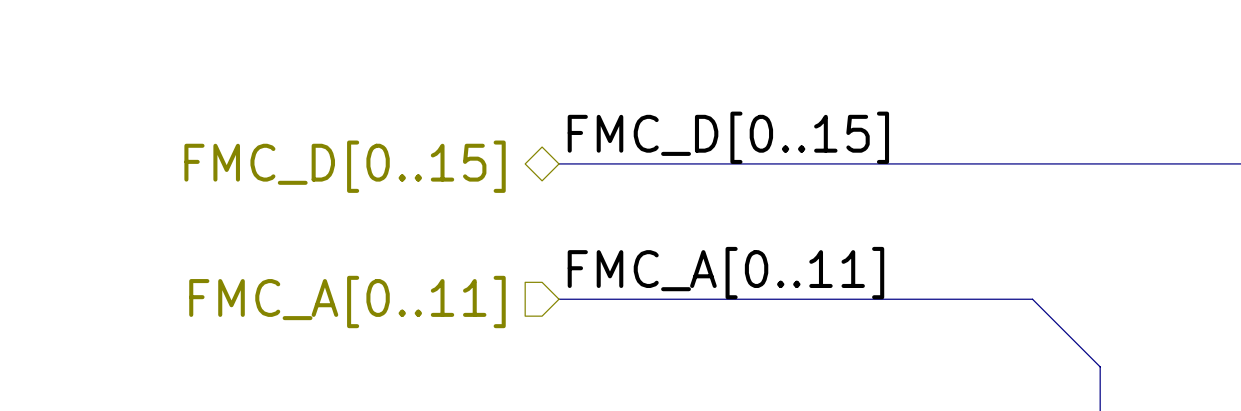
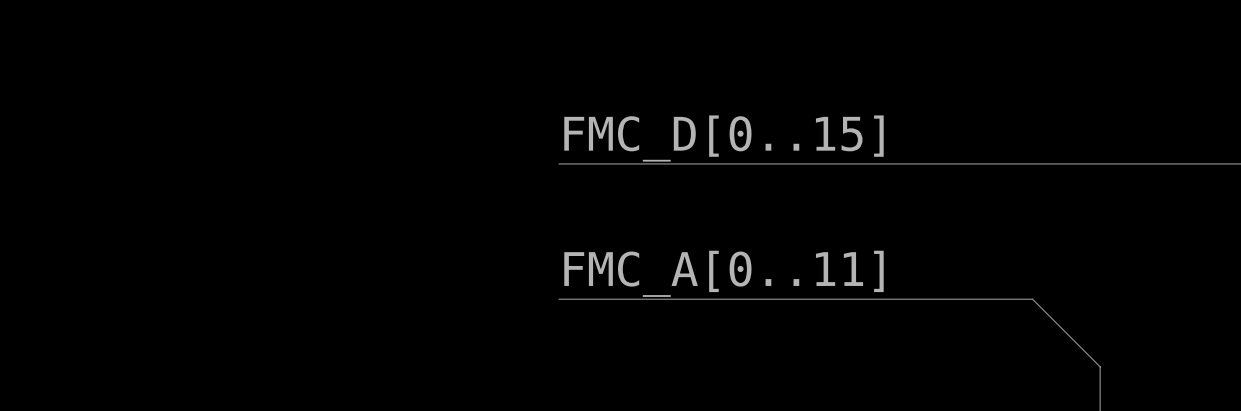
hierarchical label: FMC_D[0..15] (345, 166) -> none
hierarchical label: FMC_A[0..11] (347, 302) -> none

